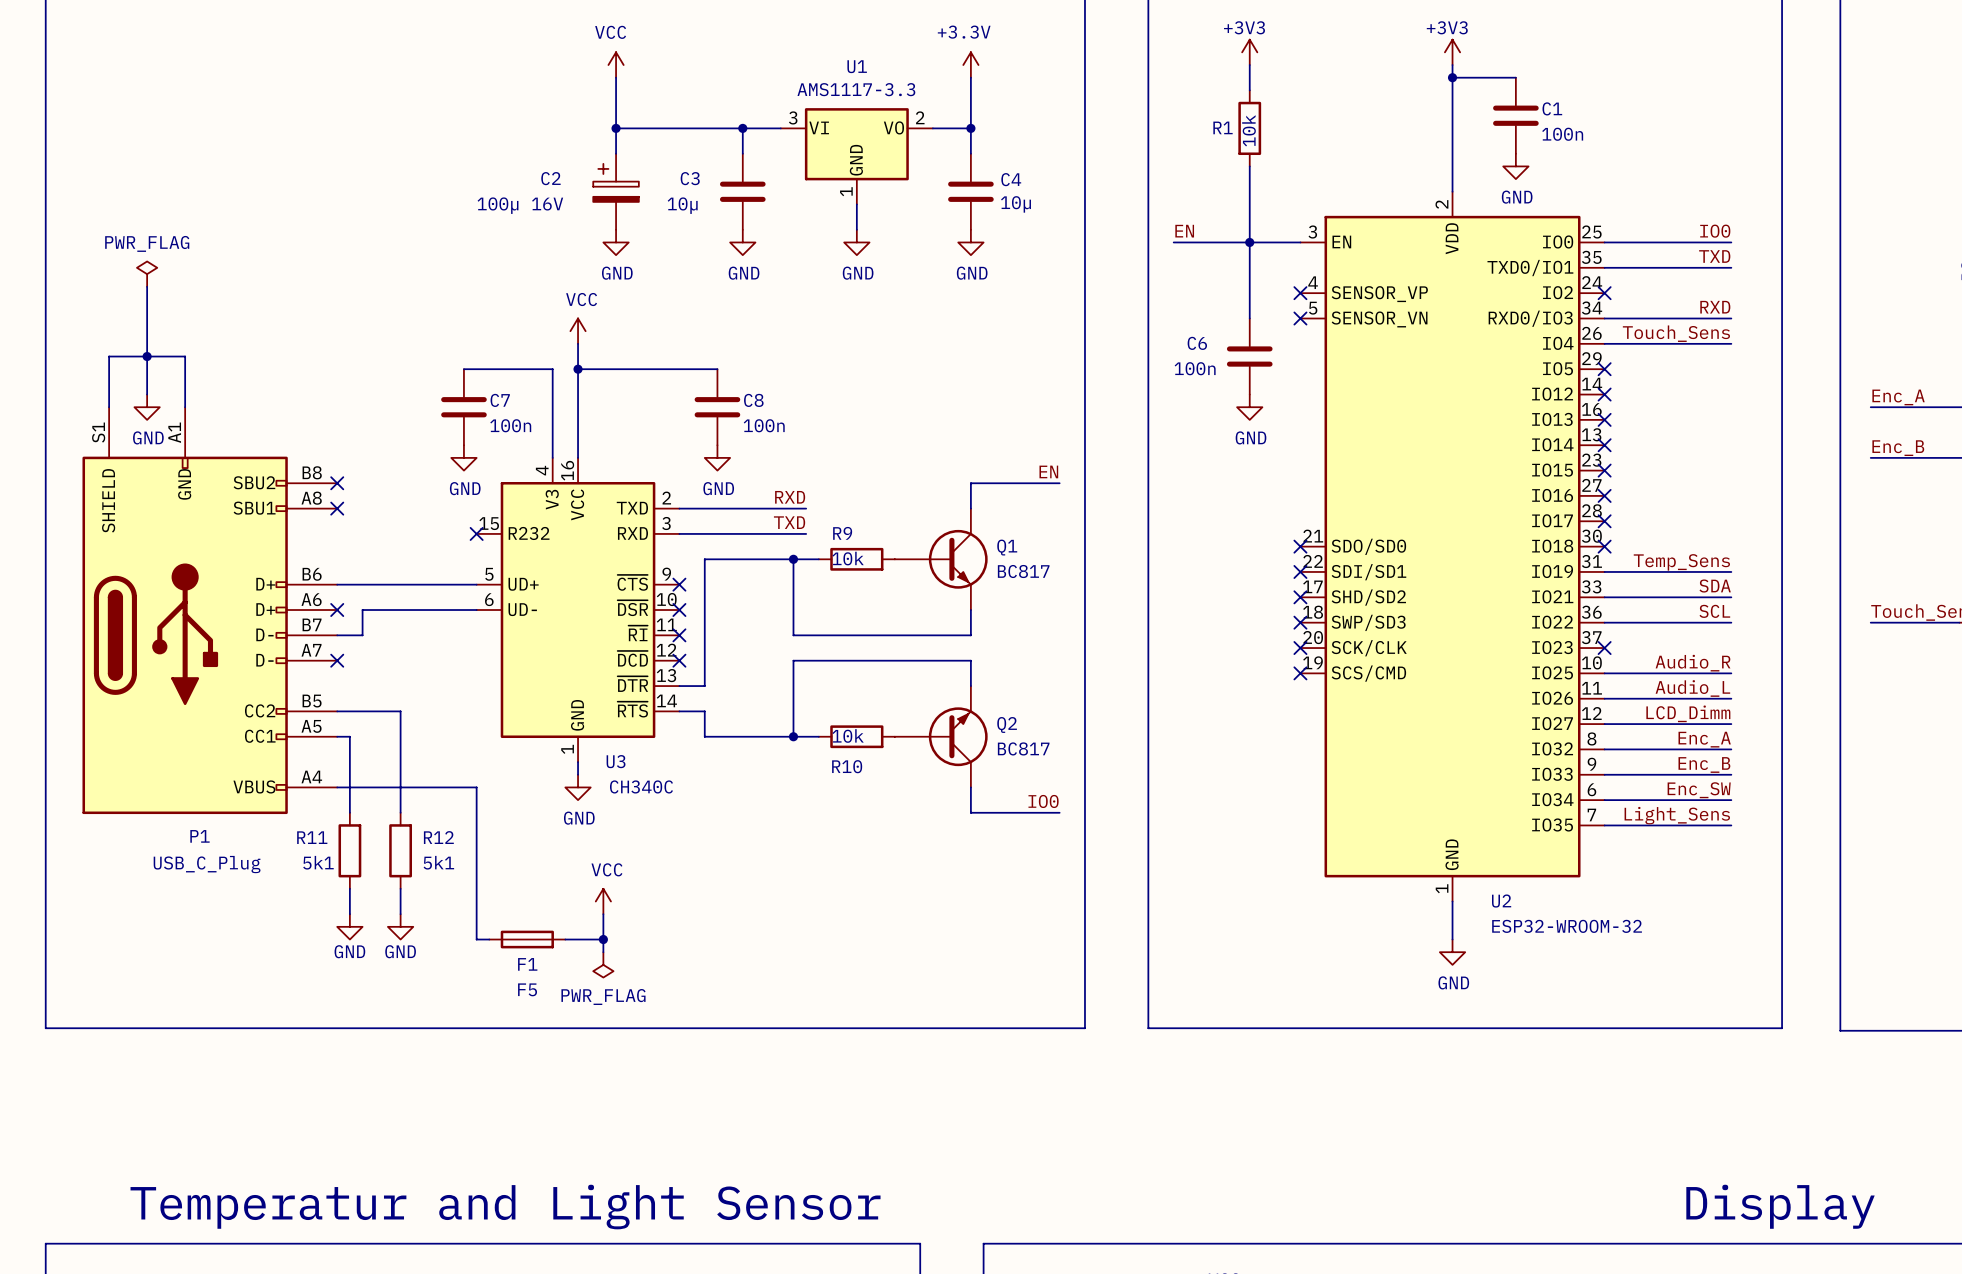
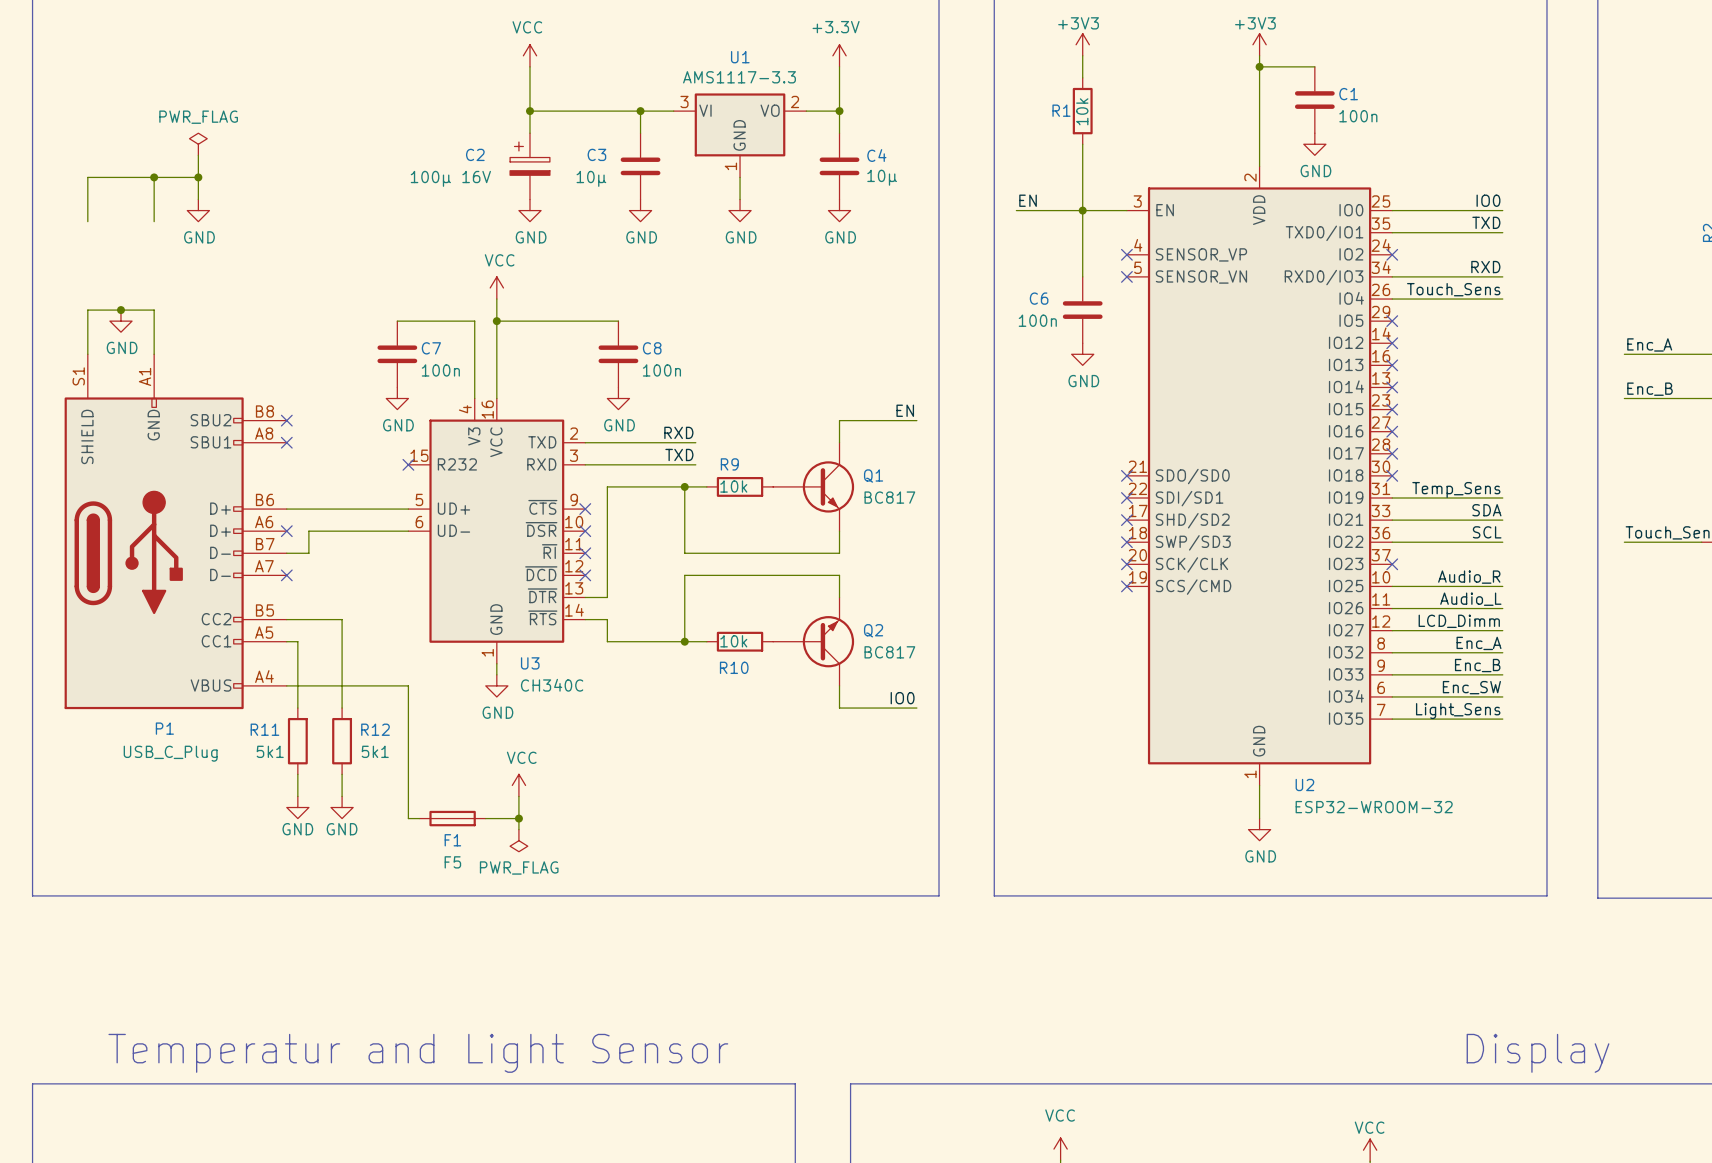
wire: none -> (198, 155) (198, 199)
wire: none -> (154, 177) (154, 221)
junction: none -> (154, 177)
wire: none -> (198, 177) (87, 177) (87, 221)
junction: none -> (198, 177)
power symbol: none -> GND (198, 210)
power symbol position: PWR_FLAG (147, 274) -> PWR_FLAG (198, 144)
wire: (147, 286) (147, 394) -> none
power symbol position: GND (147, 407) -> GND (120, 321)

